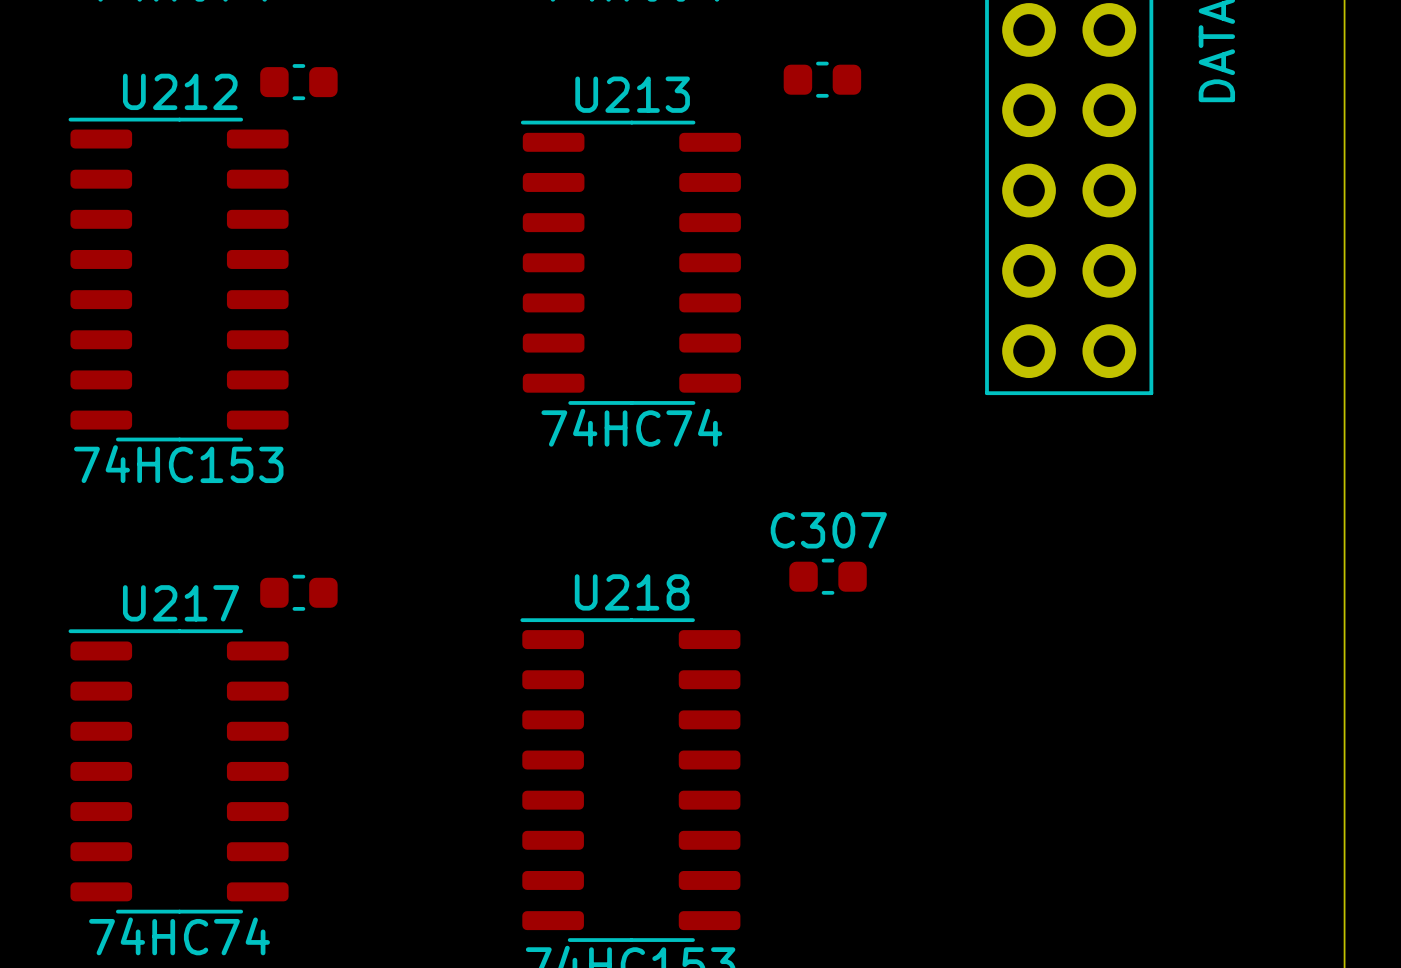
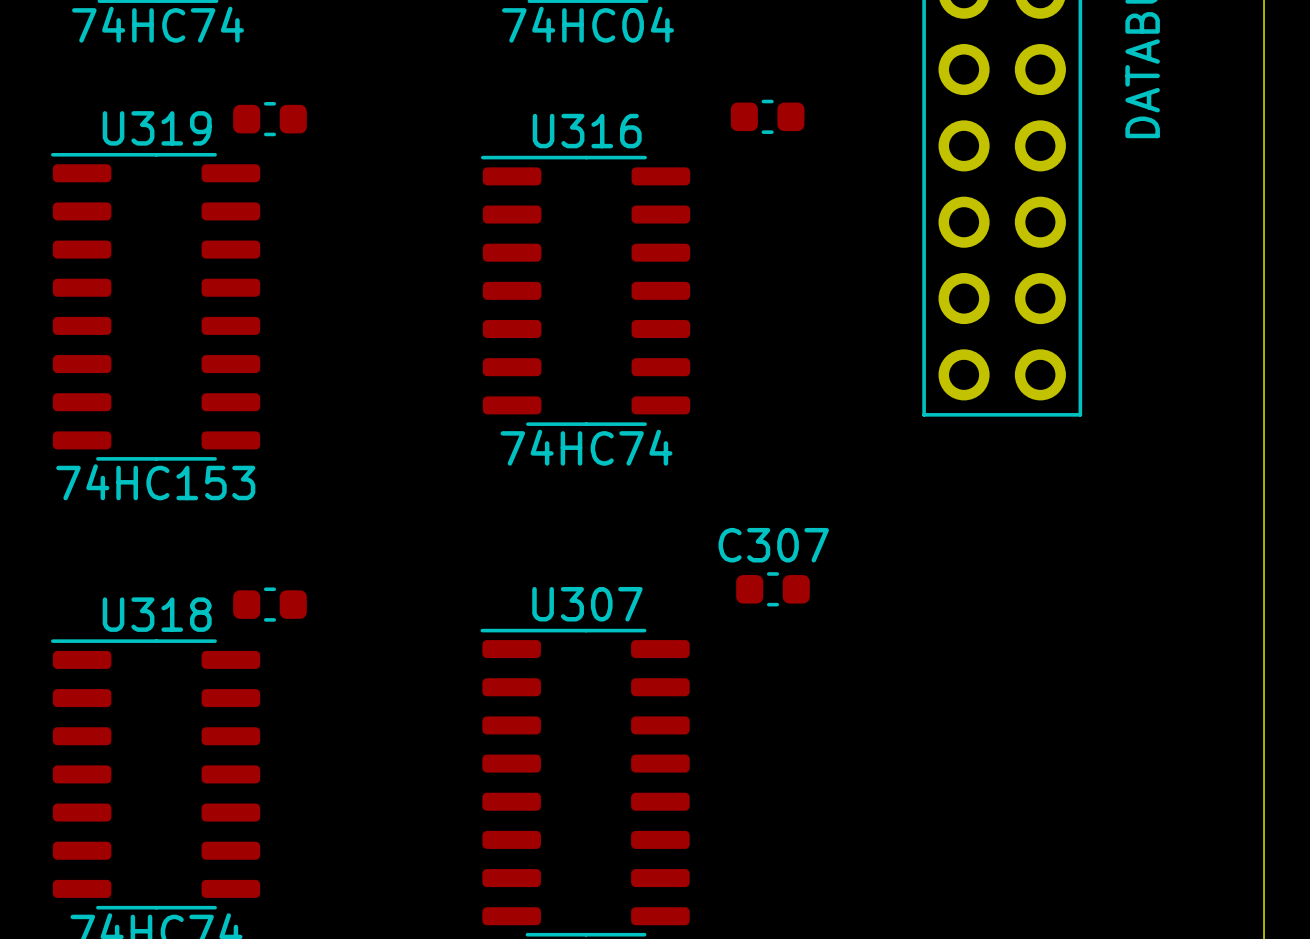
U212 name: U212 (180, 91) -> U319 (157, 128)
U213 name: U213 (632, 94) -> U316 (587, 131)
U218 name: U218 (632, 592) -> U307 (587, 604)
U217 name: U217 (181, 603) -> U318 (157, 614)

